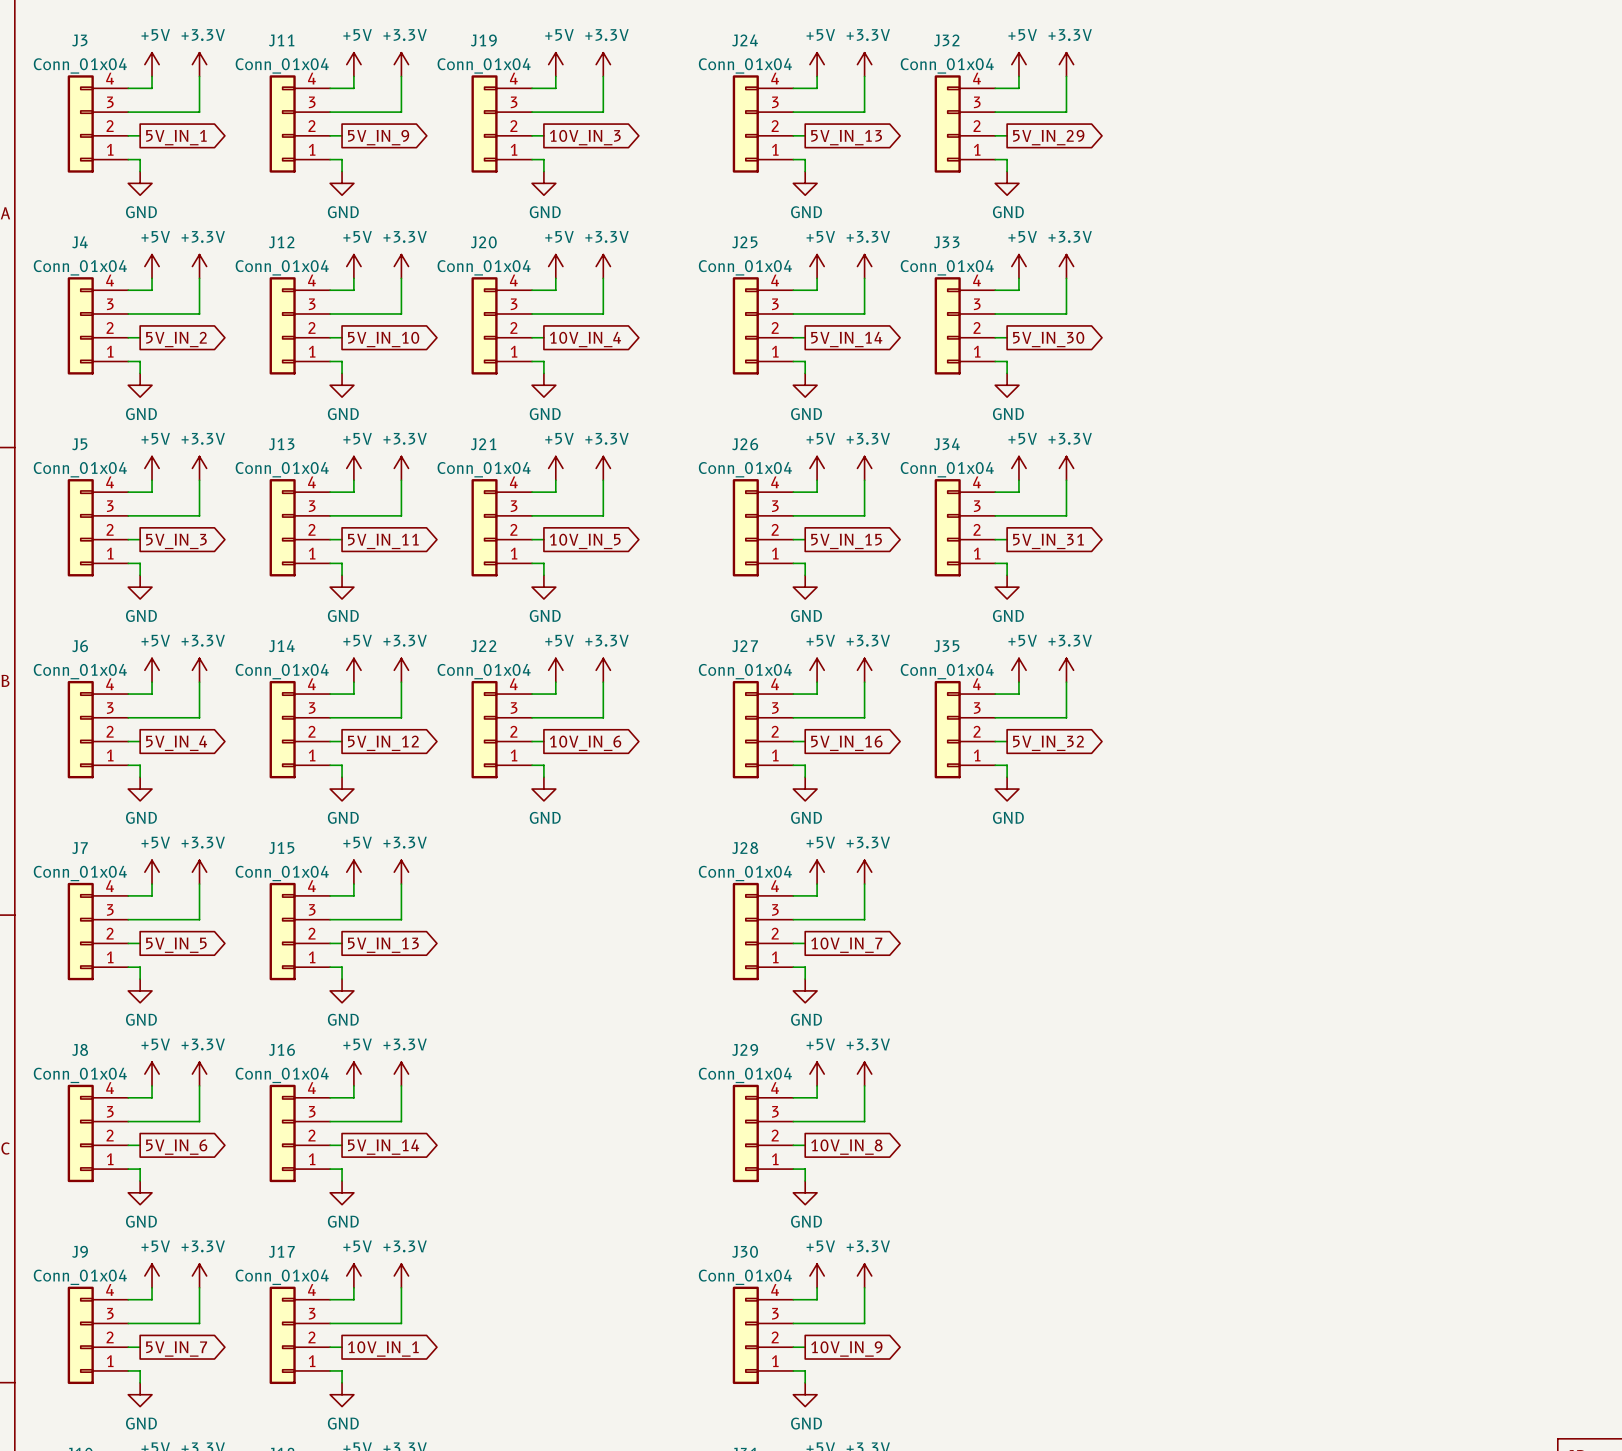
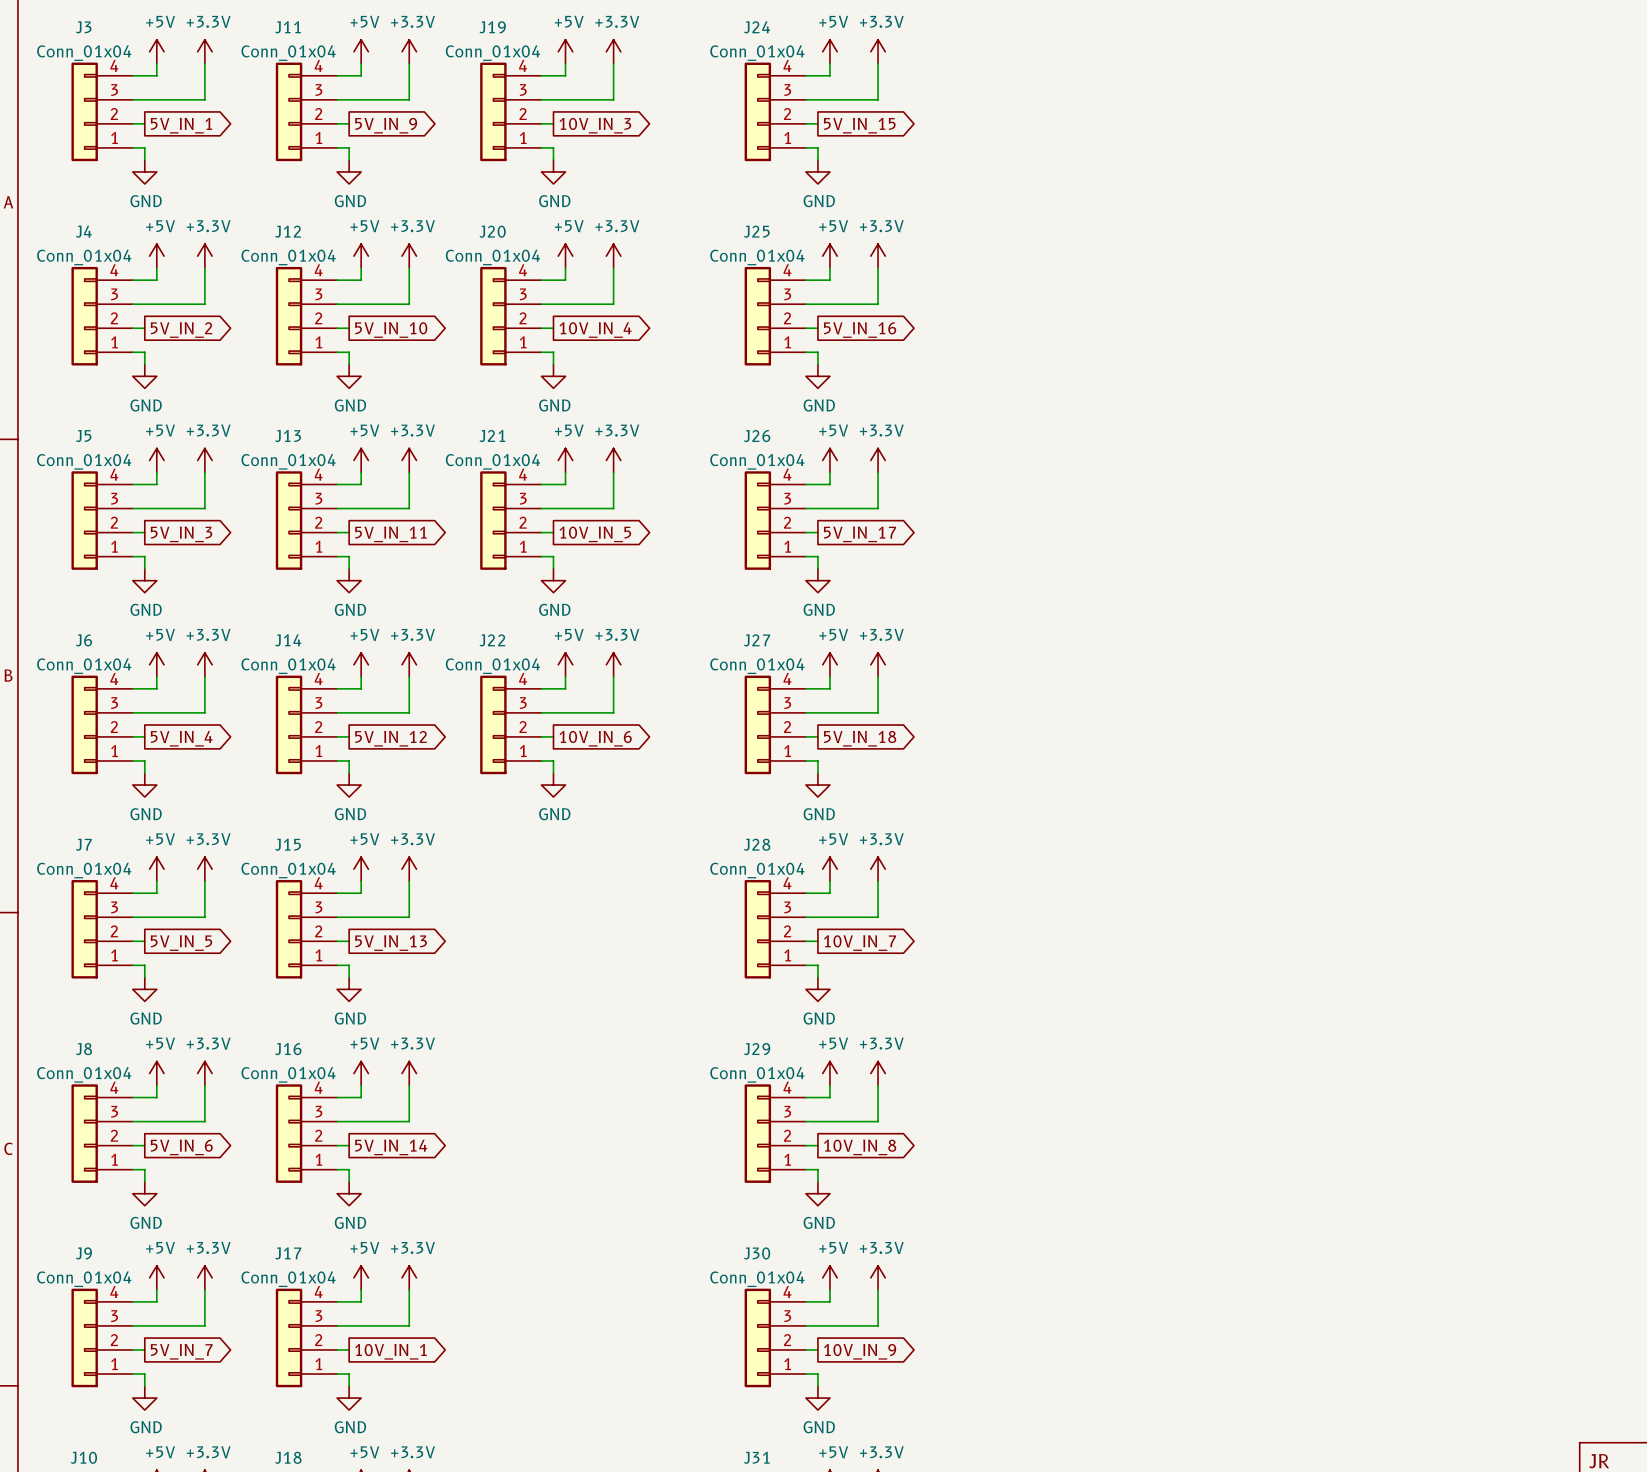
power symbol: +5V (1018, 64) -> none
power symbol: +3.3V (1066, 64) -> none
wire: (1018, 76) (1018, 88) (995, 88) -> none
wire: (1066, 76) (1066, 112) (995, 112) -> none
J32: Conn_01x04 (964, 123) -> none
wire: (995, 135) (1007, 135) -> none
global label: 5V_IN_13 (846, 137) -> 5V_IN_15 (859, 125)
global label: 5V_IN_29 (1048, 137) -> none
wire: (995, 159) (1007, 159) (1007, 171) -> none
power symbol: GND (1007, 183) -> none
power symbol: +5V (1018, 266) -> none
power symbol: +3.3V (1066, 266) -> none
wire: (1018, 278) (1018, 290) (995, 290) -> none
wire: (1066, 278) (1066, 313) (995, 313) -> none
J33: Conn_01x04 (964, 325) -> none
wire: (995, 337) (1007, 337) -> none
global label: 5V_IN_14 (846, 339) -> 5V_IN_16 (860, 330)
global label: 5V_IN_30 (1048, 339) -> none
wire: (995, 361) (1007, 361) (1007, 373) -> none
power symbol: GND (1007, 385) -> none
power symbol: +5V (1018, 468) -> none
power symbol: +3.3V (1066, 468) -> none
wire: (1018, 480) (1018, 492) (995, 492) -> none
wire: (1066, 480) (1066, 515) (995, 515) -> none
J34: Conn_01x04 (964, 527) -> none
wire: (995, 539) (1007, 539) -> none
global label: 5V_IN_15 (846, 541) -> 5V_IN_17 (860, 534)
global label: 5V_IN_31 (1048, 541) -> none
wire: (995, 563) (1007, 563) (1007, 575) -> none
power symbol: GND (1007, 587) -> none
power symbol: +5V (1018, 670) -> none
power symbol: +3.3V (1066, 670) -> none
wire: (1018, 682) (1018, 694) (995, 694) -> none
wire: (1066, 682) (1066, 717) (995, 717) -> none
J35: Conn_01x04 (964, 729) -> none
wire: (995, 741) (1007, 741) -> none
global label: 5V_IN_16 (846, 743) -> 5V_IN_18 (860, 738)
global label: 5V_IN_32 (1048, 743) -> none
wire: (995, 765) (1007, 765) (1007, 777) -> none
power symbol: GND (1007, 789) -> none

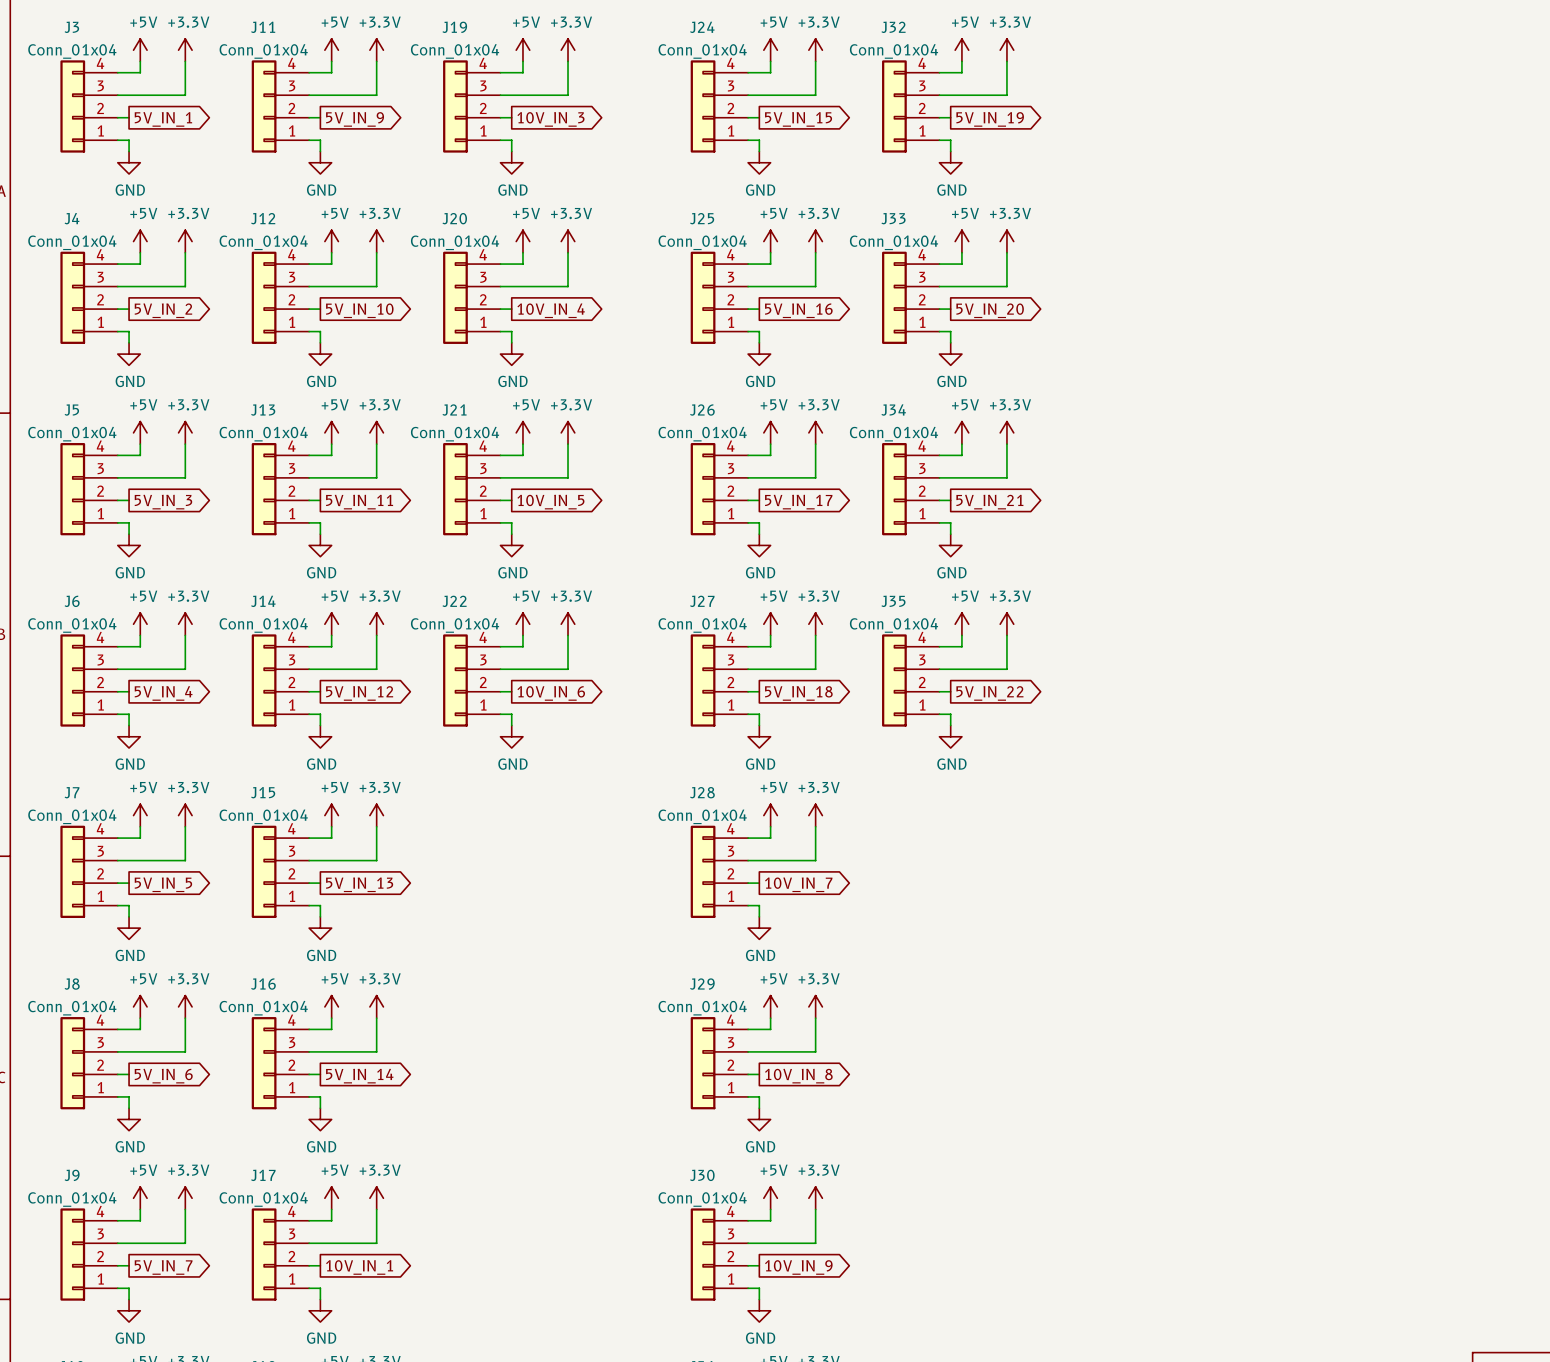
power symbol: none -> +5V (961, 50)
power symbol: none -> +3.3V (1006, 50)
wire: none -> (961, 61) (961, 72) (939, 72)
wire: none -> (1006, 61) (1006, 95) (939, 95)
J32: none -> Conn_01x04 (910, 106)
wire: none -> (939, 117) (950, 117)
global label: none -> 5V_IN_19 (990, 119)
wire: none -> (939, 140) (950, 140) (950, 151)
power symbol: none -> GND (950, 162)
power symbol: none -> +5V (961, 241)
power symbol: none -> +3.3V (1006, 241)
wire: none -> (961, 252) (961, 264) (939, 264)
wire: none -> (1006, 252) (1006, 286) (939, 286)
J33: none -> Conn_01x04 (910, 297)
wire: none -> (939, 309) (950, 309)
global label: none -> 5V_IN_20 (990, 310)
wire: none -> (939, 331) (950, 331) (950, 342)
power symbol: none -> GND (950, 354)
power symbol: none -> +5V (961, 432)
power symbol: none -> +3.3V (1006, 432)
wire: none -> (961, 444) (961, 455) (939, 455)
wire: none -> (1006, 444) (1006, 477) (939, 477)
J34: none -> Conn_01x04 (910, 489)
wire: none -> (939, 500) (950, 500)
global label: none -> 5V_IN_21 (989, 502)
wire: none -> (939, 522) (950, 522) (950, 534)
power symbol: none -> GND (950, 545)
power symbol: none -> +5V (961, 624)
power symbol: none -> +3.3V (1006, 624)
wire: none -> (961, 635) (961, 646) (939, 646)
wire: none -> (1006, 635) (1006, 669) (939, 669)
J35: none -> Conn_01x04 (910, 680)
wire: none -> (939, 691) (950, 691)
global label: none -> 5V_IN_22 (989, 693)
wire: none -> (939, 714) (950, 714) (950, 725)
power symbol: none -> GND (950, 736)

